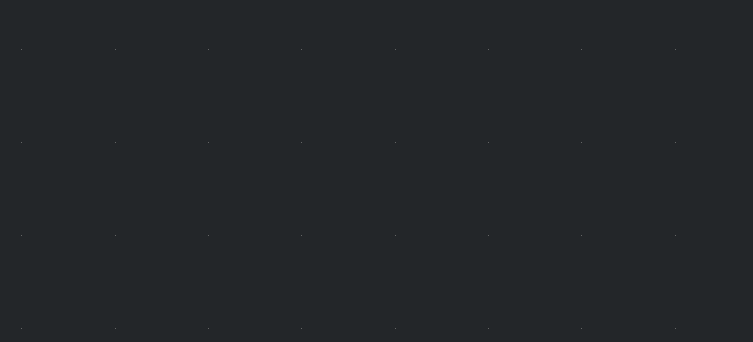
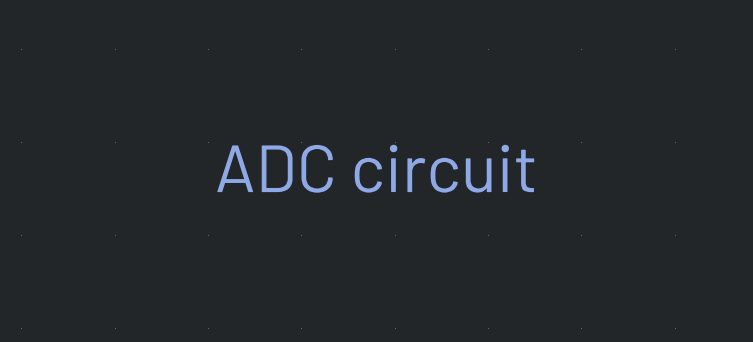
text: none -> ADC circuit (375, 168)

